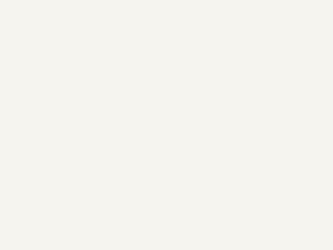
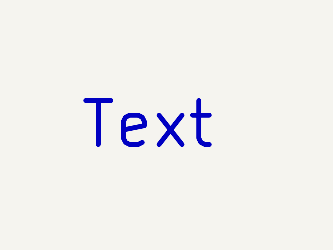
text: none -> Text (147, 122)

